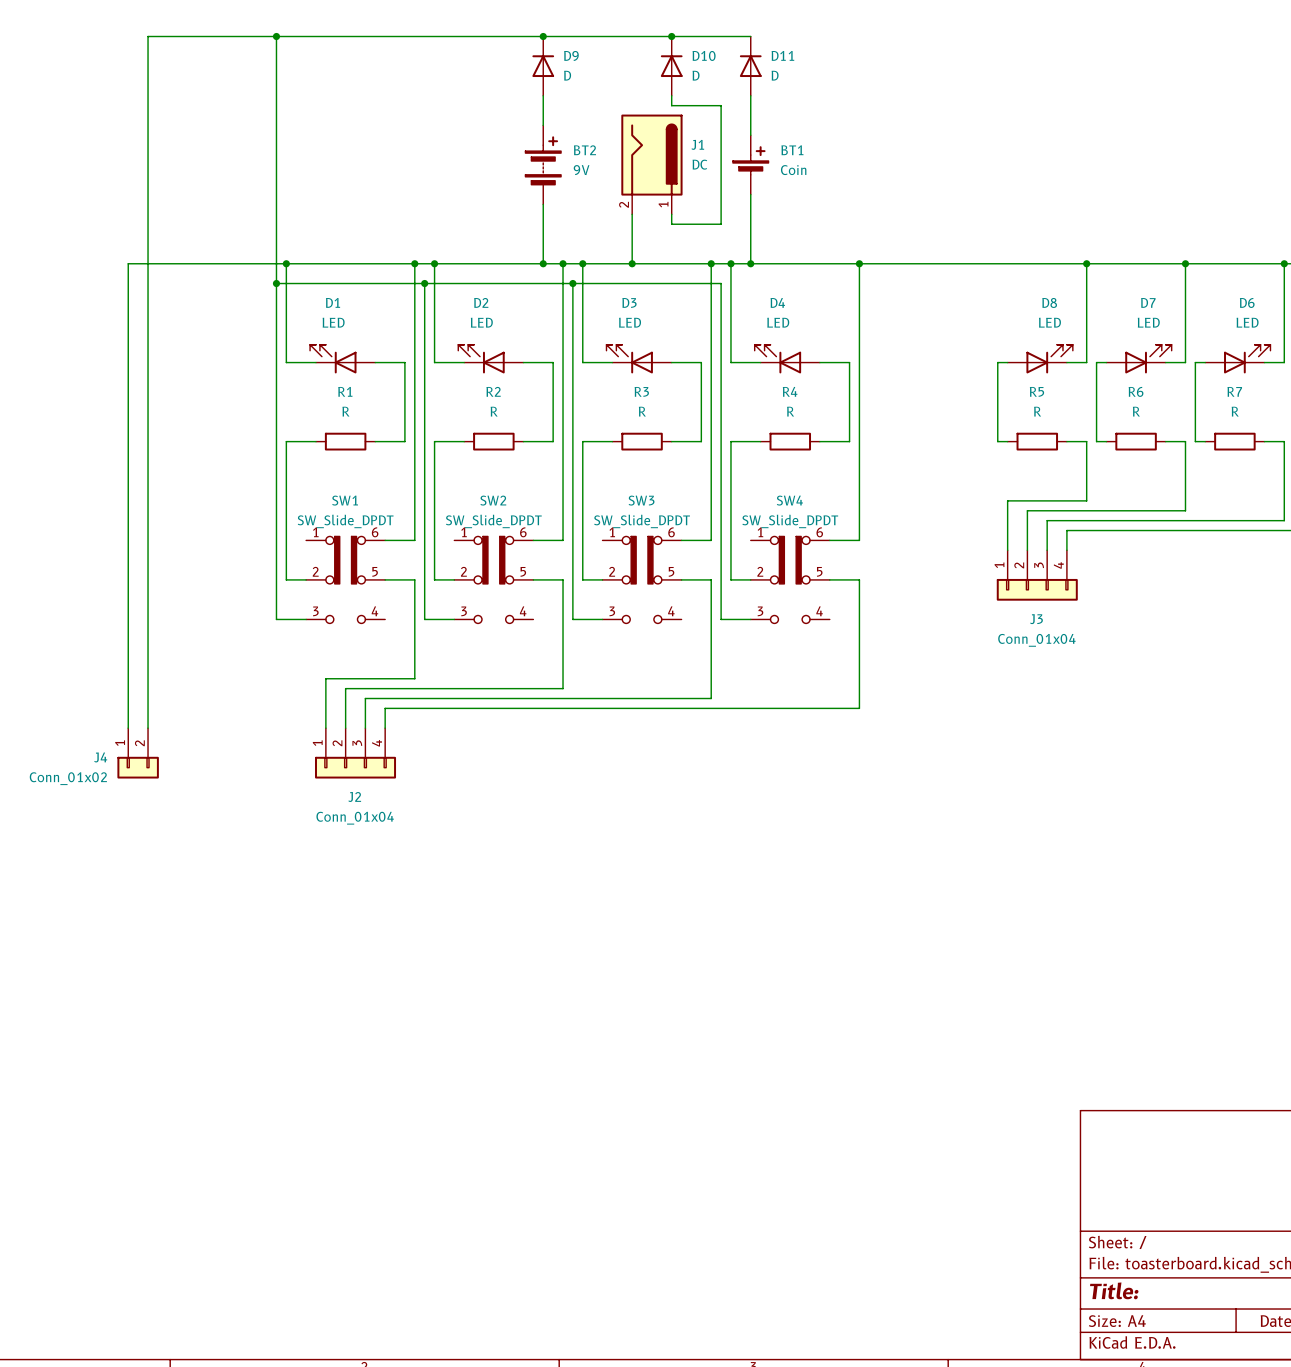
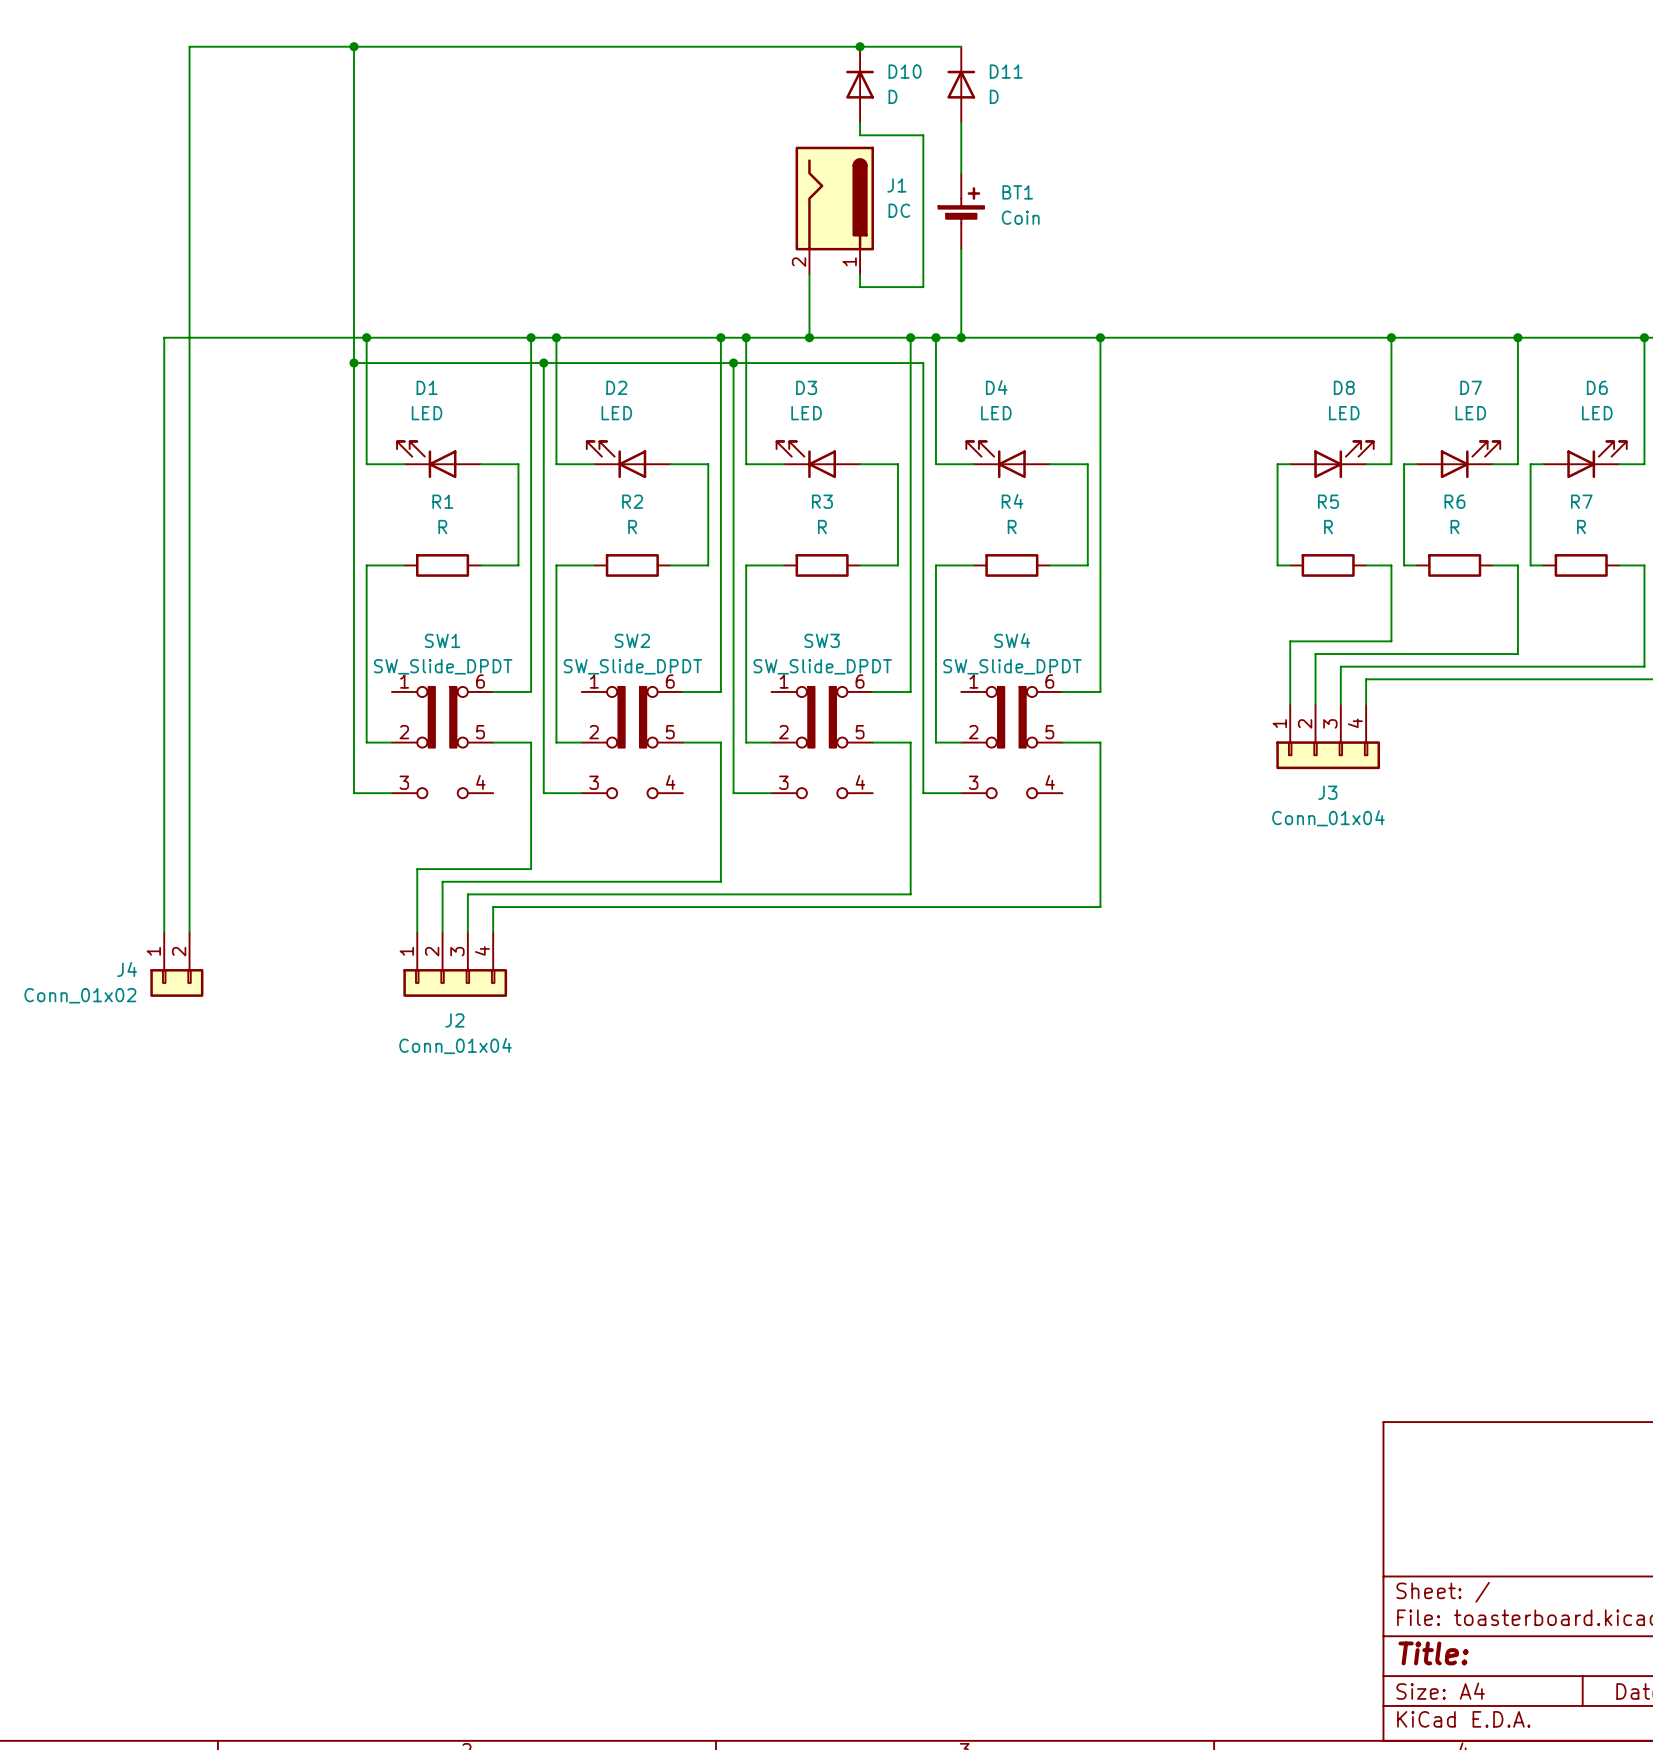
junction: (543, 36) -> none
D9: D (543, 66) -> none
wire: (543, 95) (543, 125) -> none
BT2: 9V (543, 164) -> none
wire: (543, 204) (543, 263) -> none
junction: (543, 263) -> none

